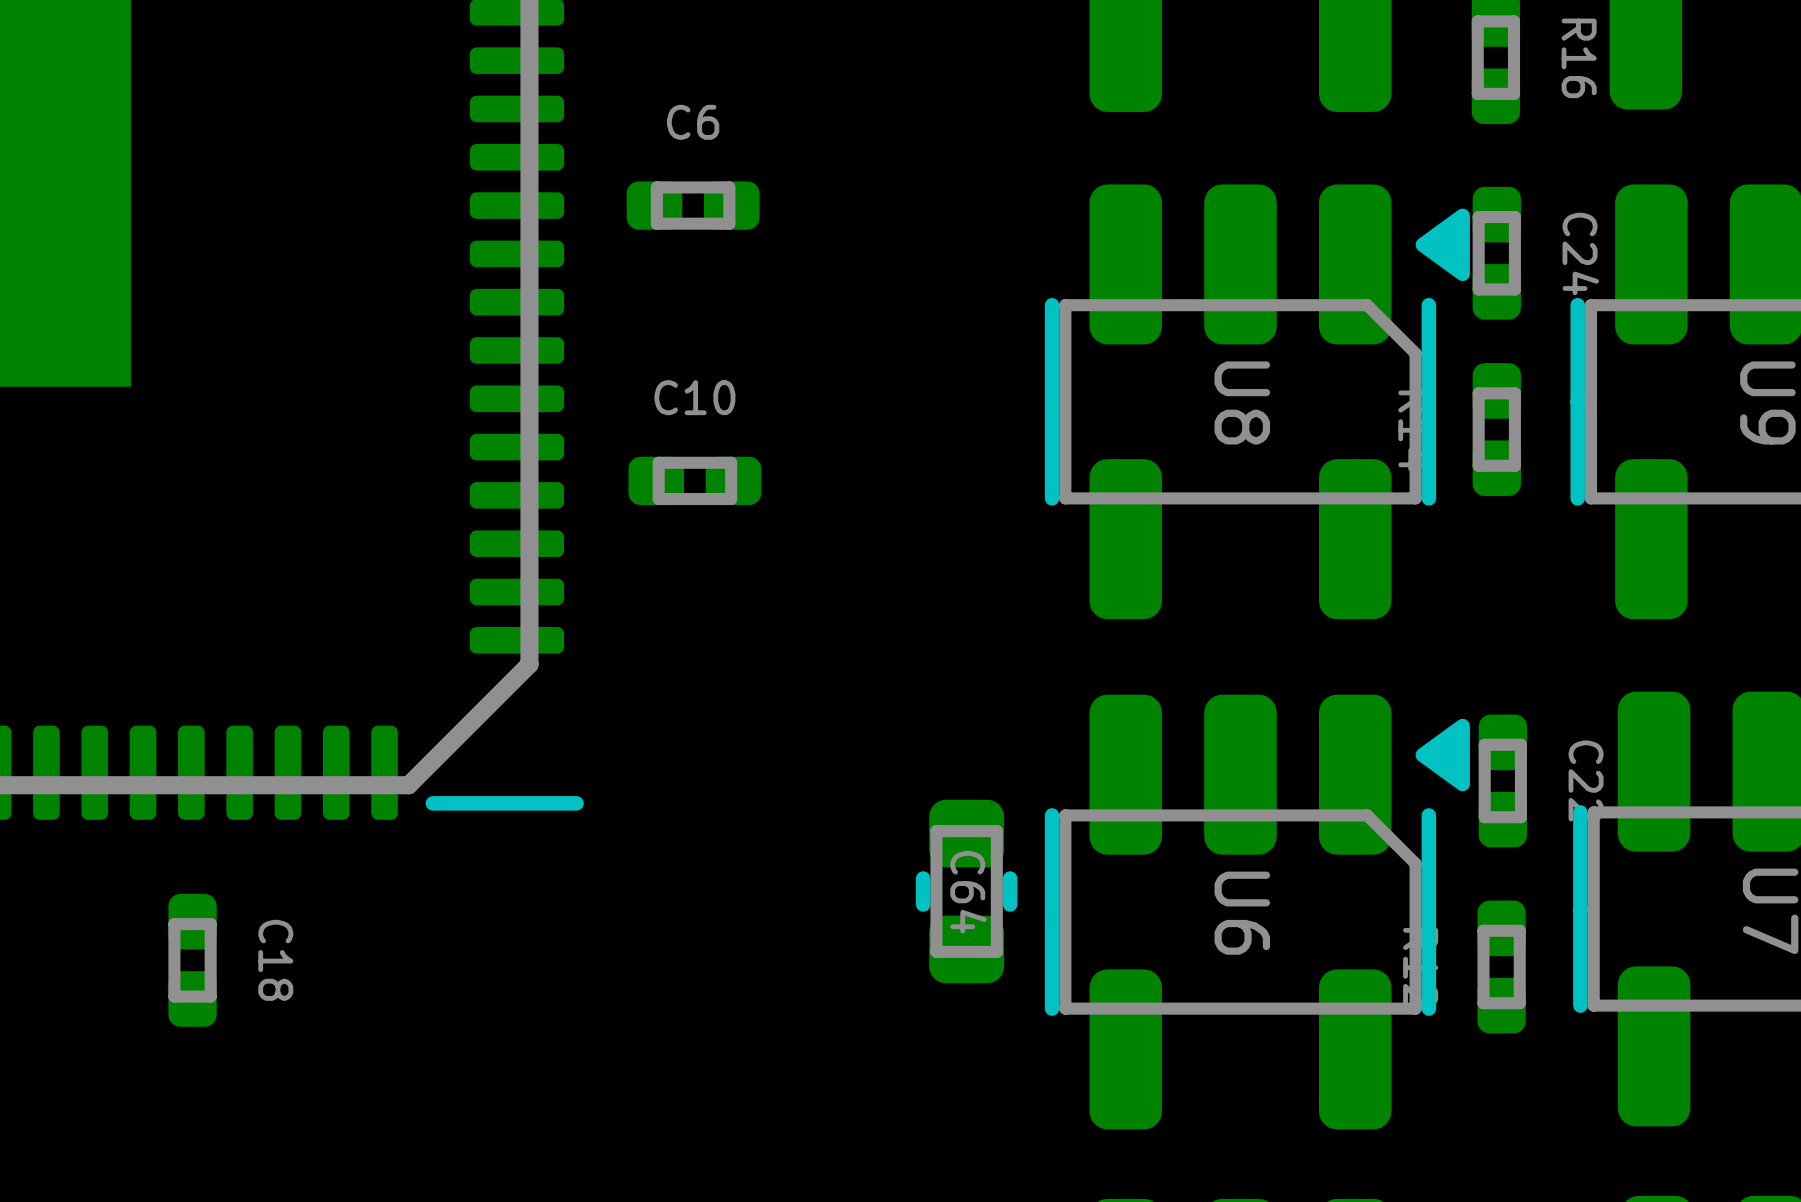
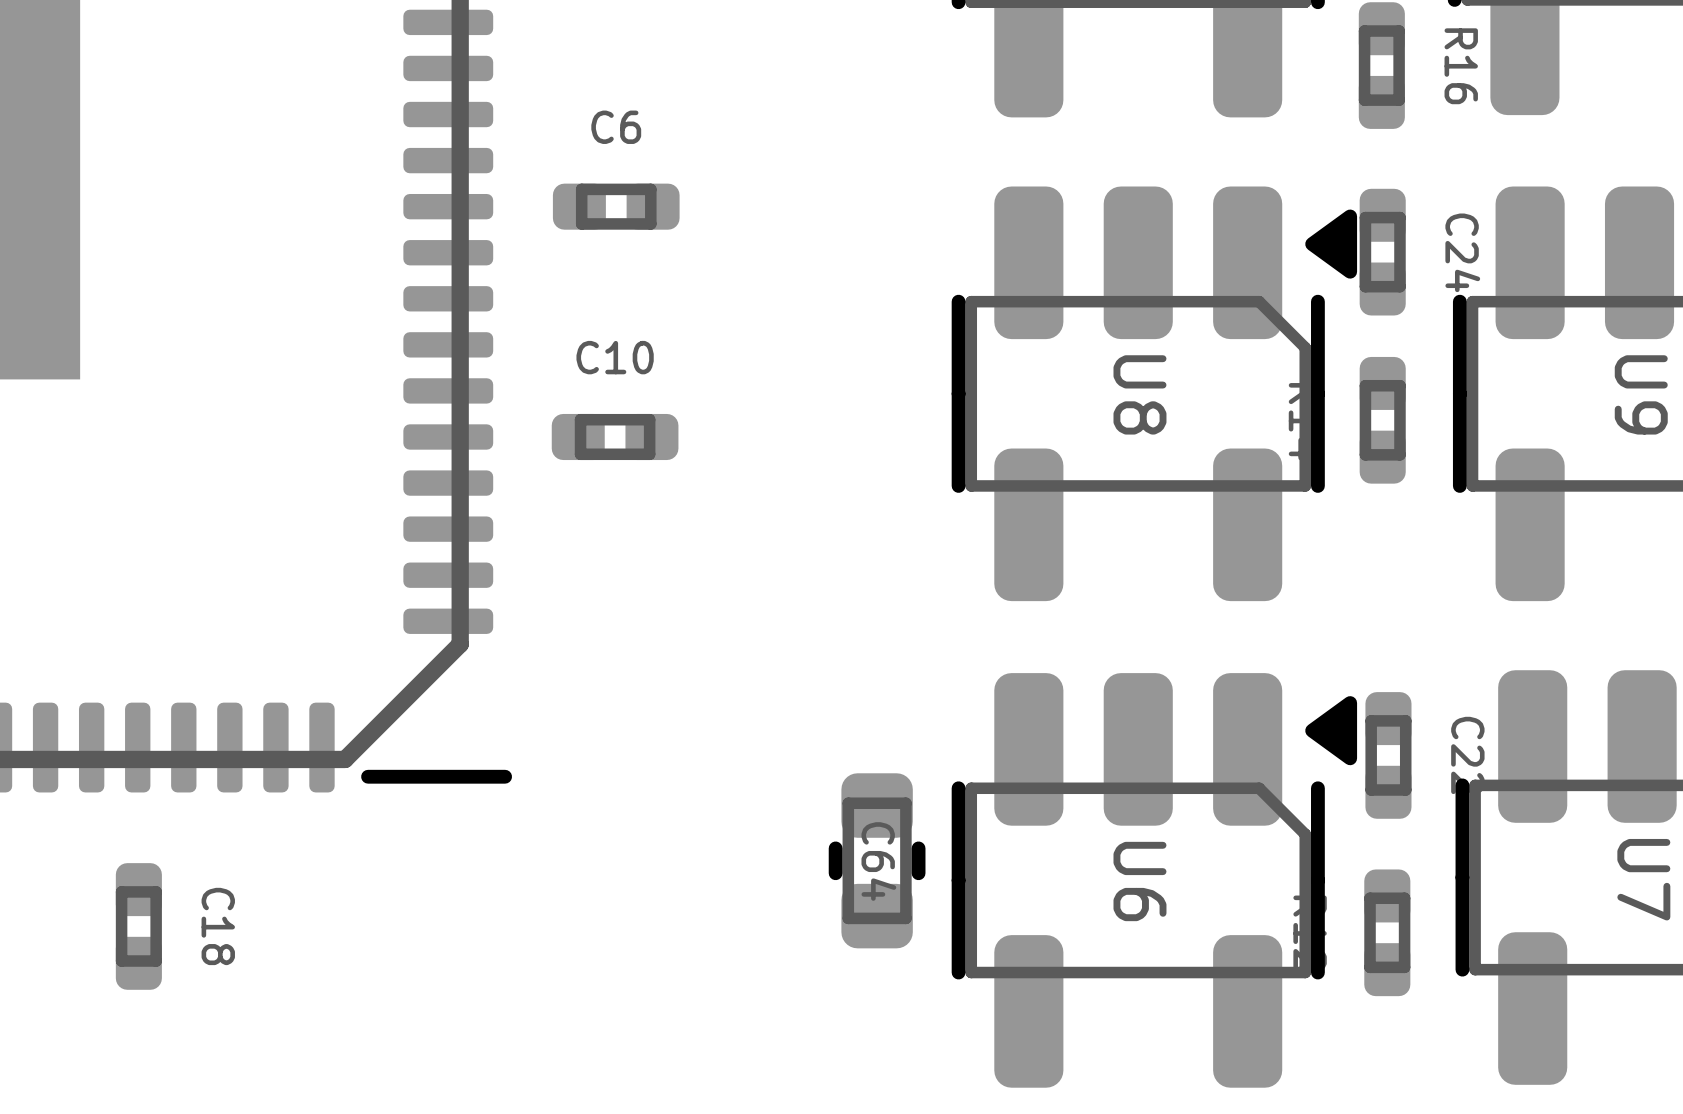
C10 position: (694, 480) -> (615, 436)

